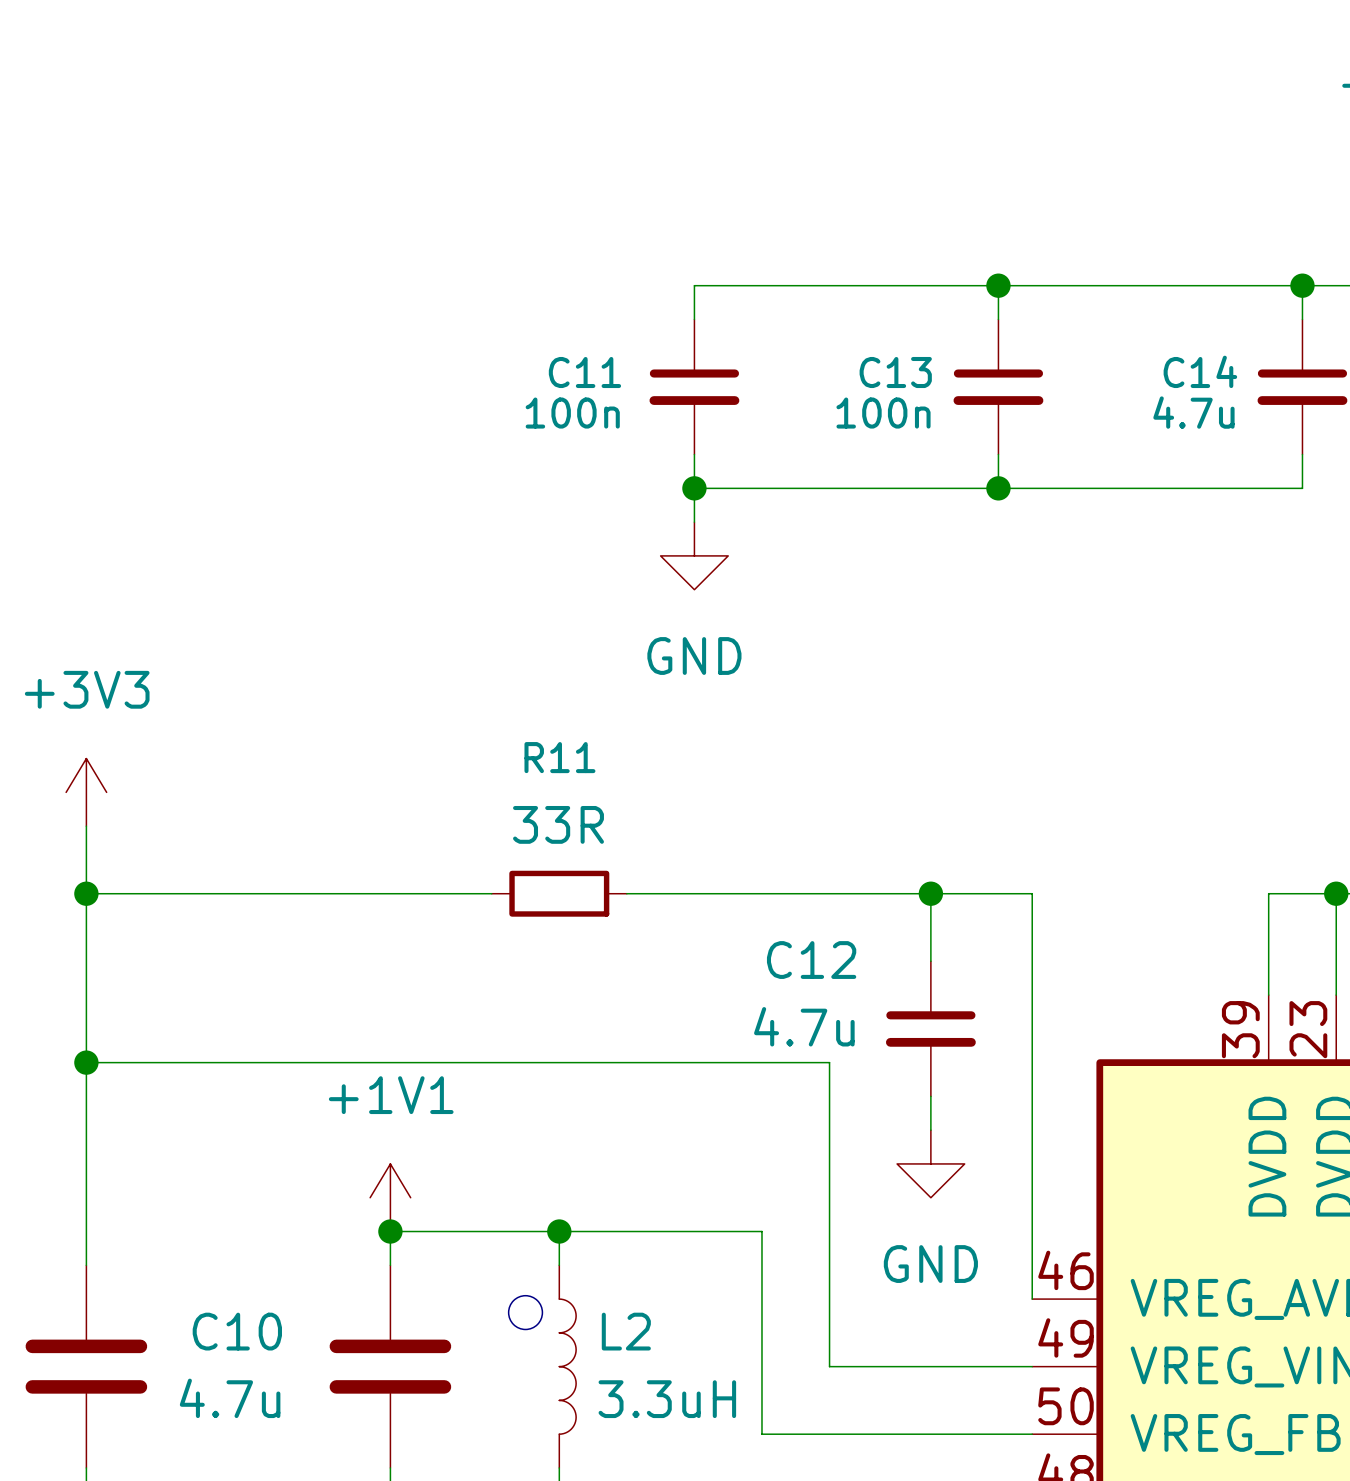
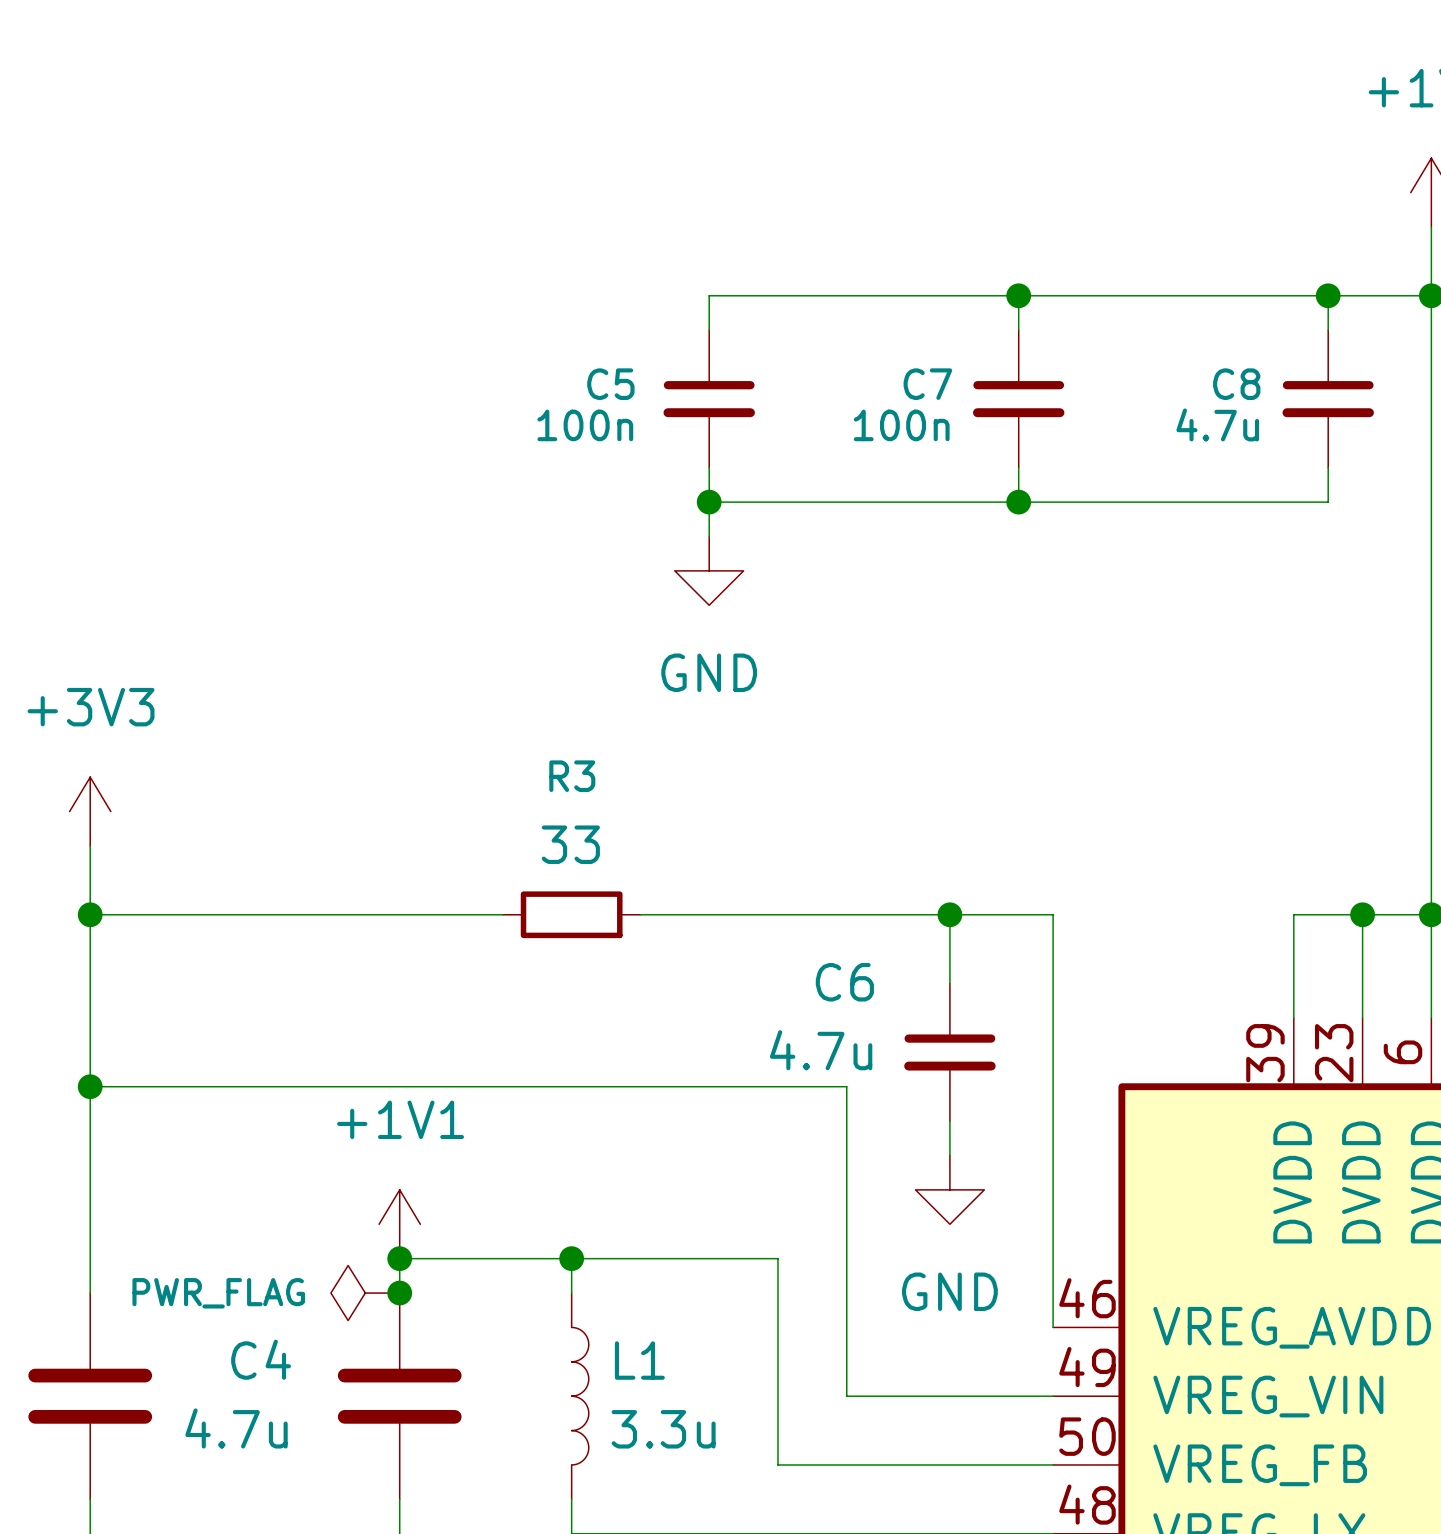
C14 name: C14 (1200, 371) -> C8 (1236, 384)
C11 name: C11 (584, 372) -> C5 (610, 384)
C13 name: C13 (895, 372) -> C7 (927, 384)
R11 name: R11 (559, 757) -> R3 (572, 776)
R11 value: 33R (558, 824) -> 33 (570, 844)
C12 name: C12 (811, 960) -> C6 (844, 982)
power symbol: none -> PWR_FLAG (365, 1293)
junction: none -> (399, 1293)
drawing: [508, 1295, 543, 1330] -> none
C10 name: C10 (237, 1331) -> C4 (261, 1359)
L2 name: L2 (626, 1331) -> L1 (639, 1360)
L2 value: 3.3uH (667, 1399) -> 3.3u (663, 1429)

